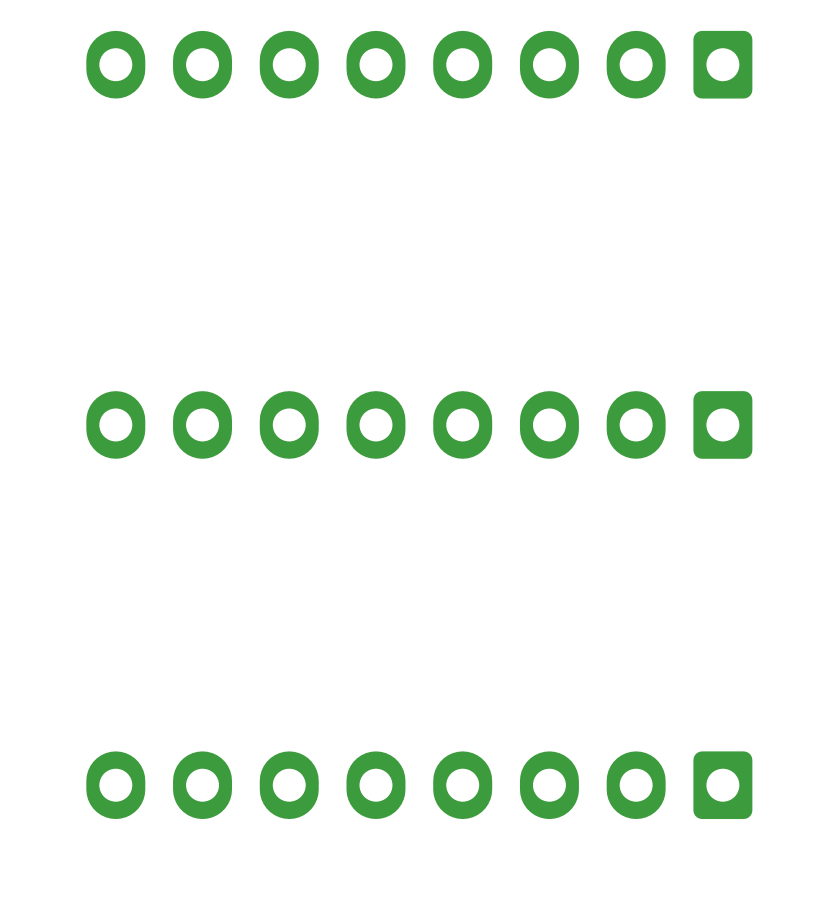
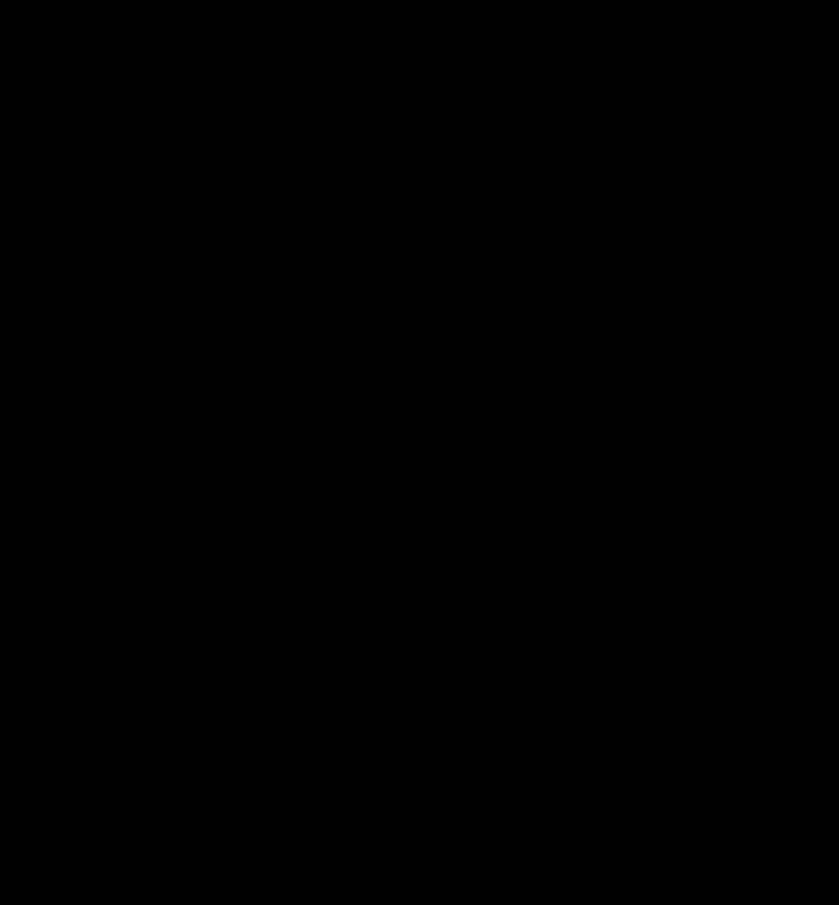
part: (419, 64) -> none
part: (419, 424) -> none
part: (419, 785) -> none

